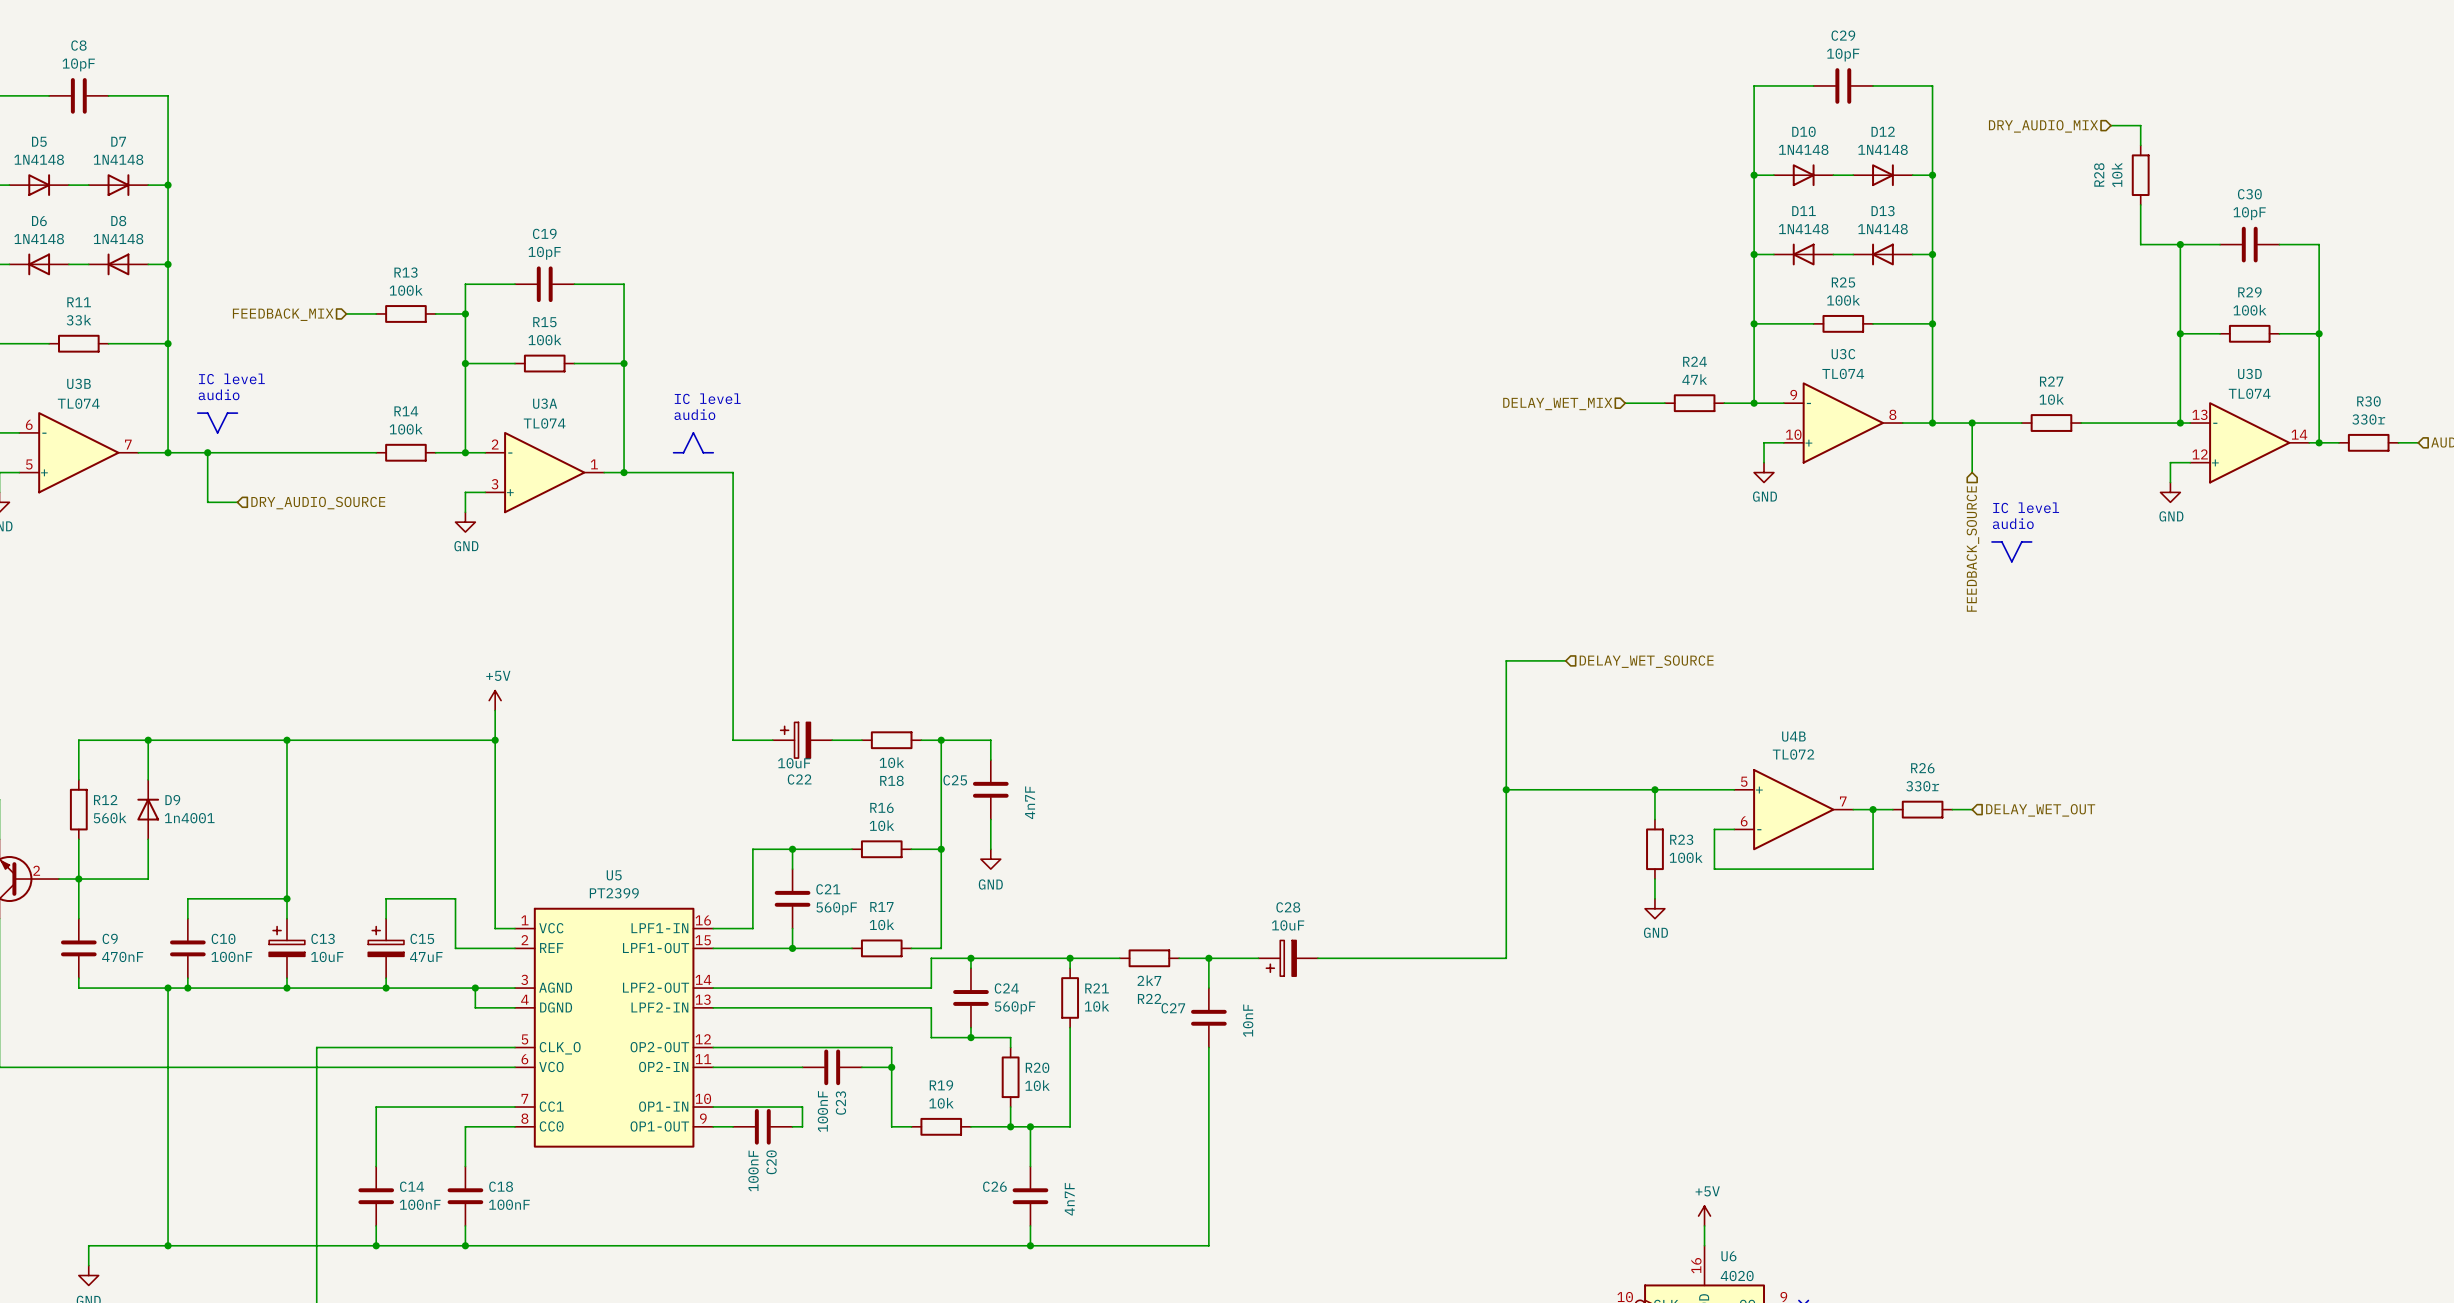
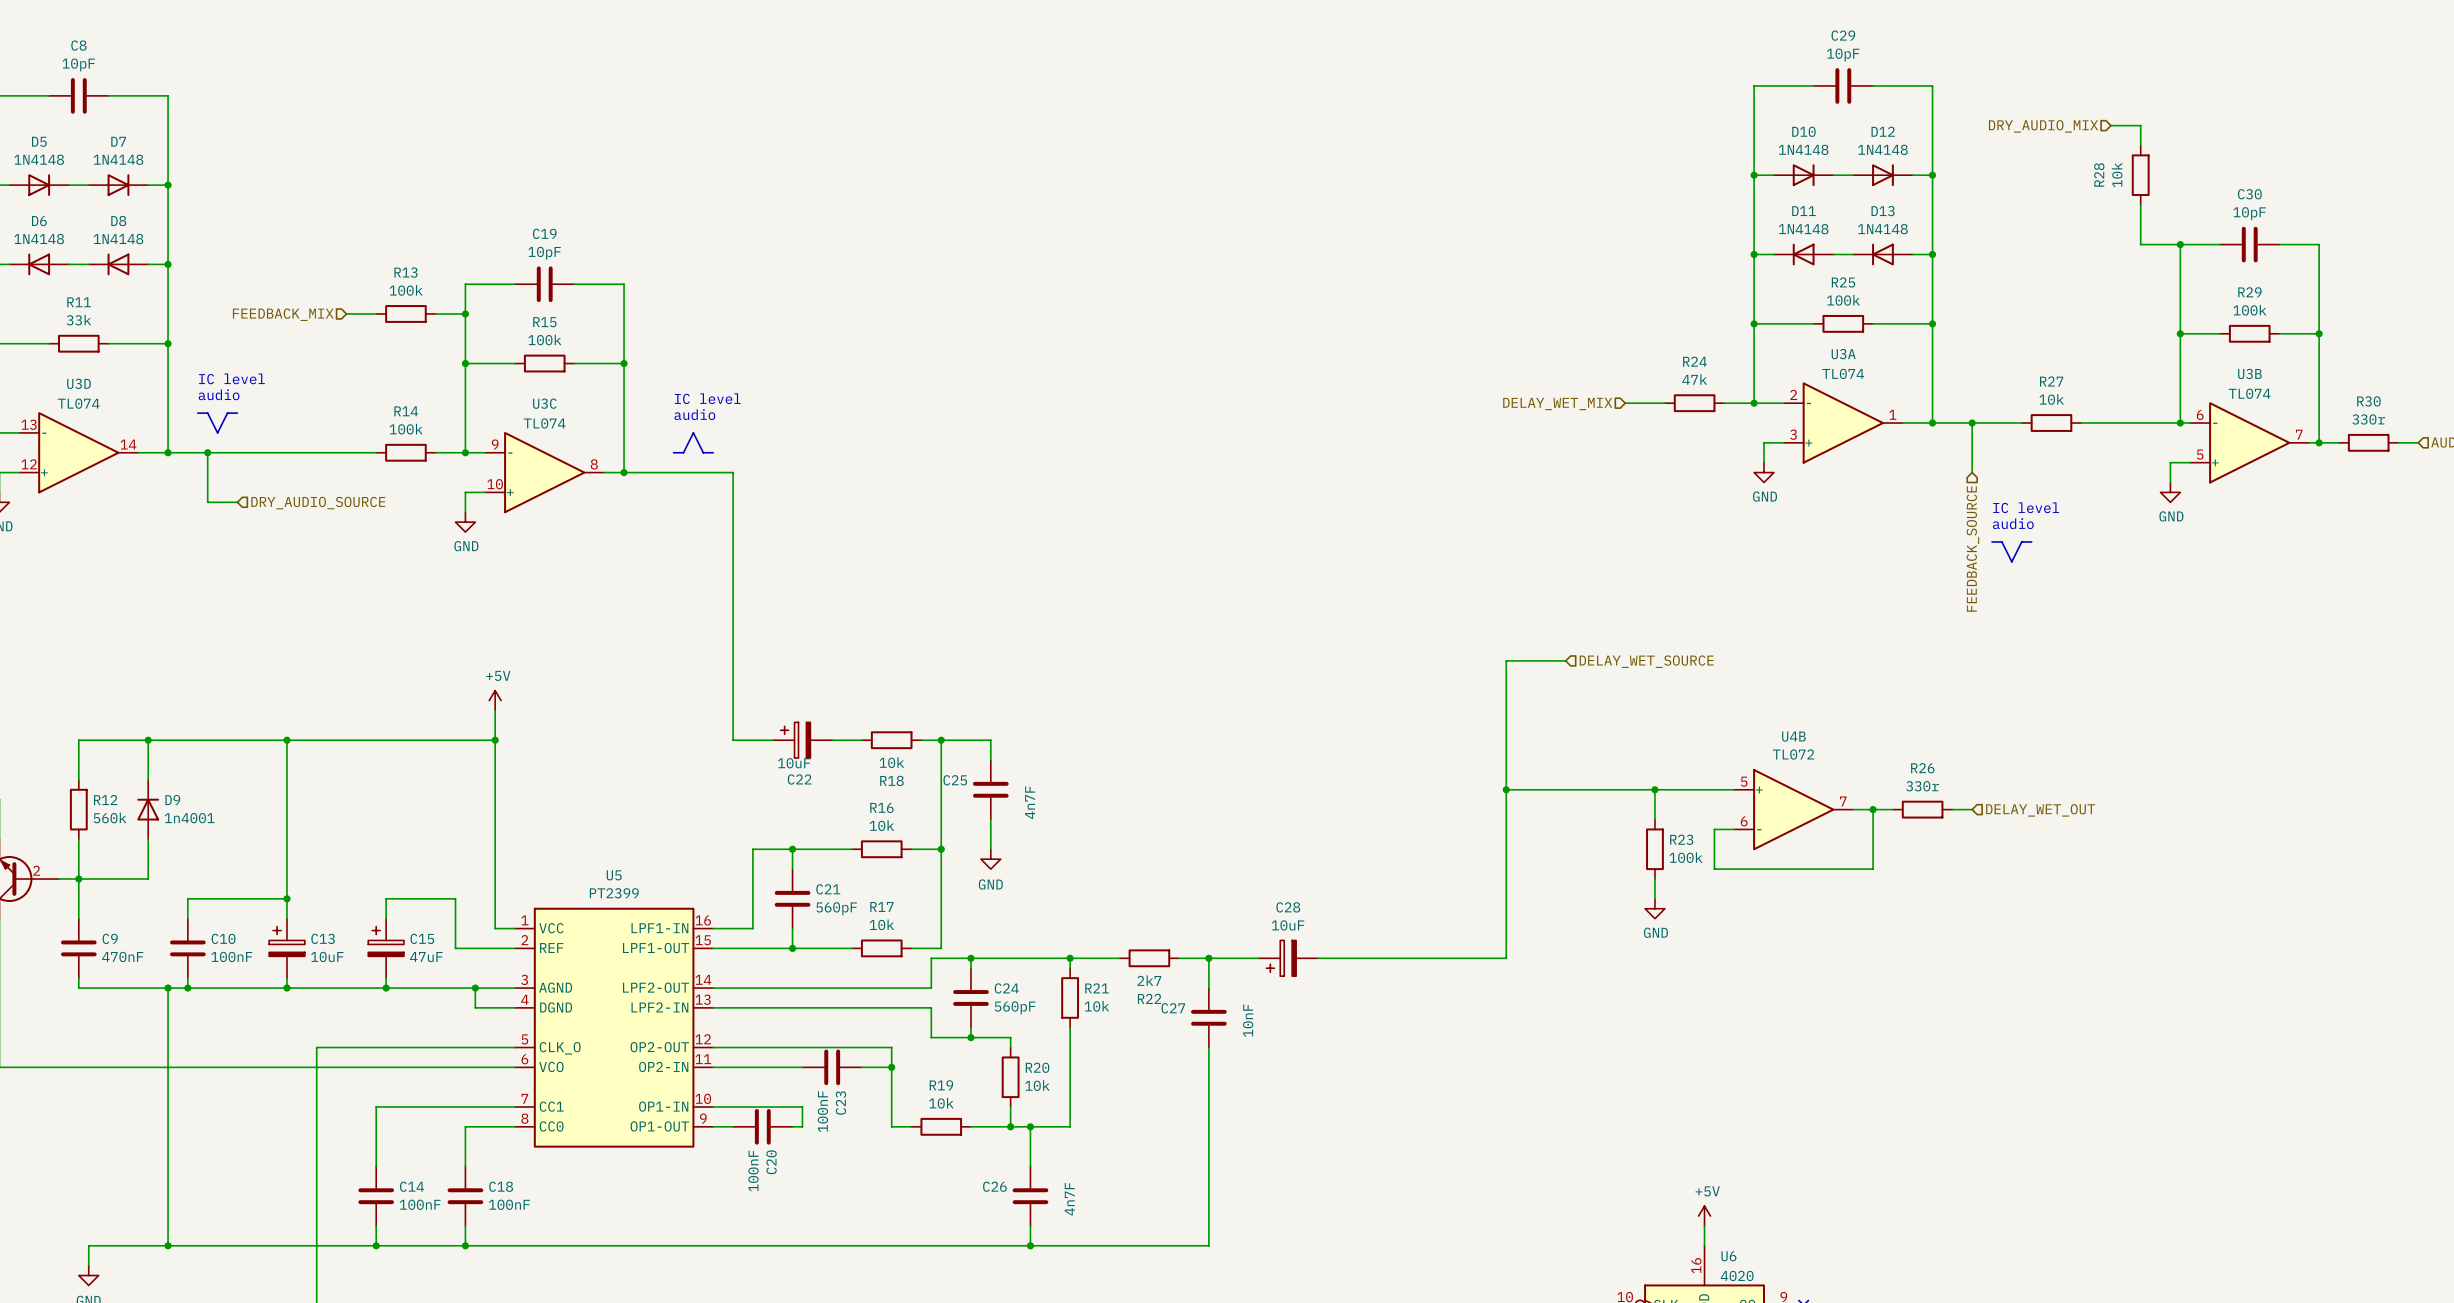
U3C position: (1843, 423) -> (544, 472)
U3D position: (2249, 442) -> (78, 452)
U3B position: (78, 452) -> (2249, 442)
U3A position: (544, 472) -> (1843, 423)

